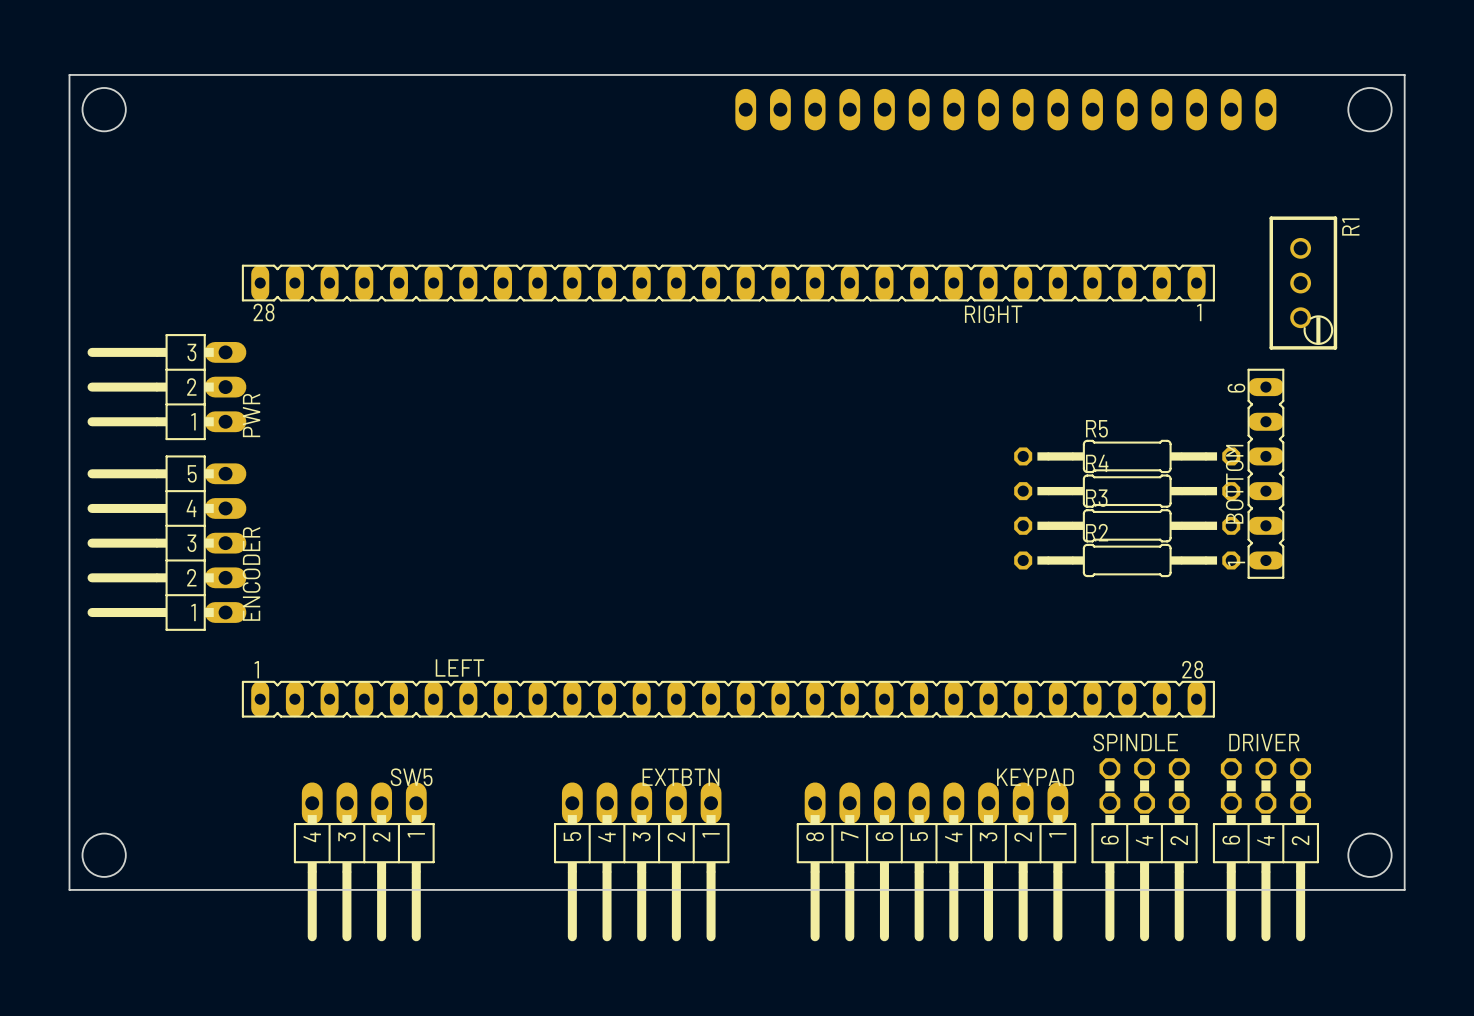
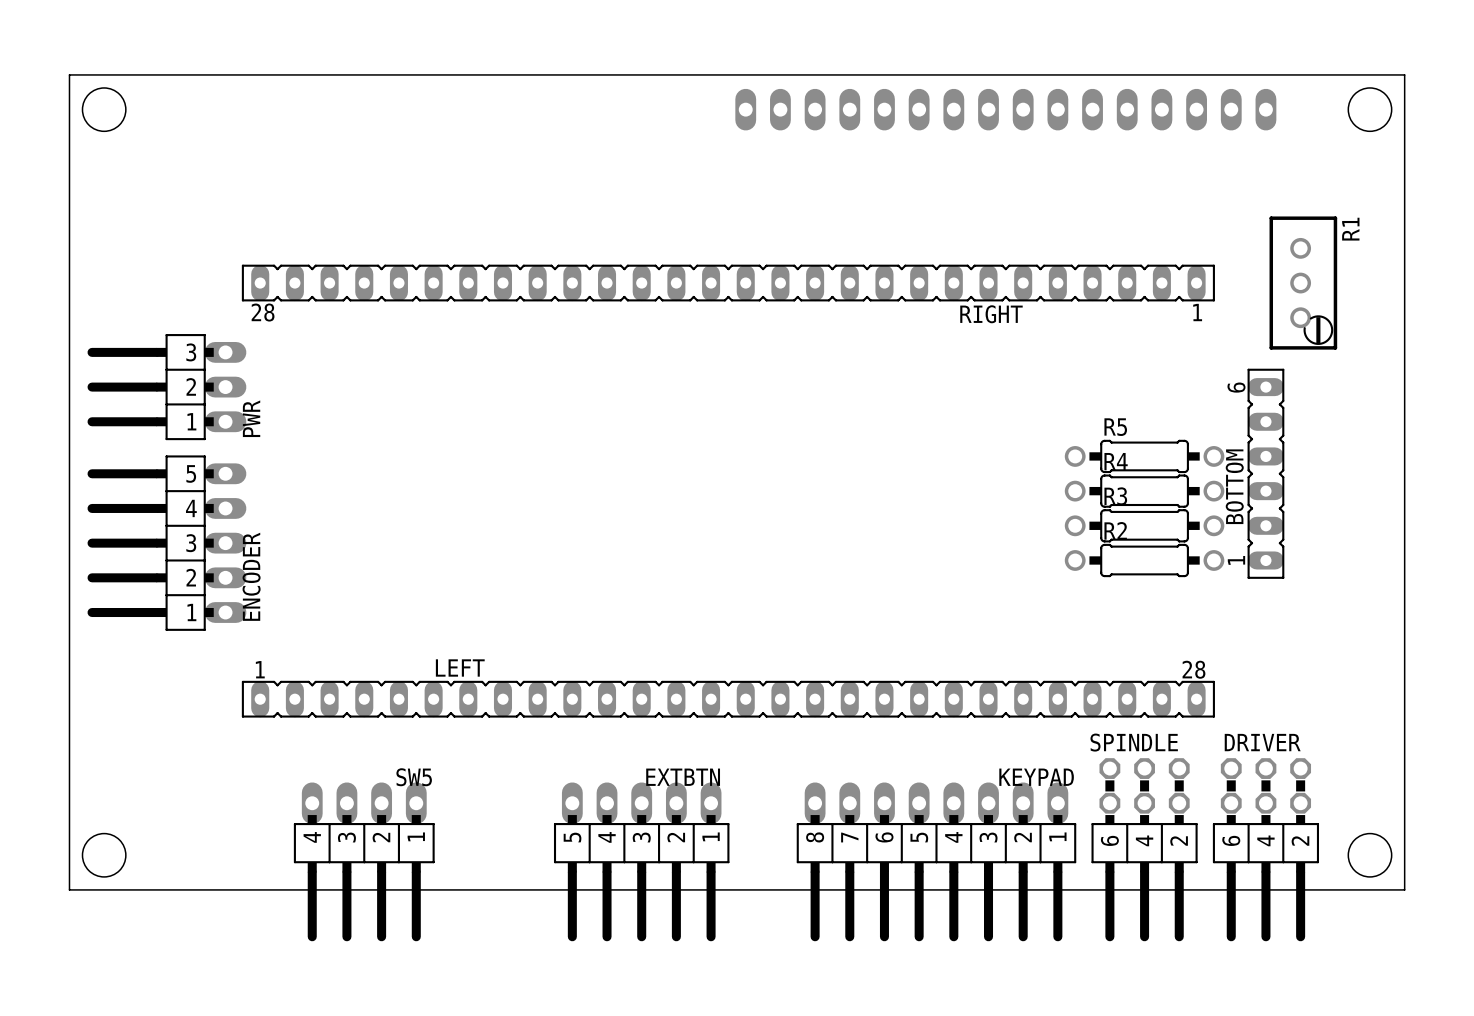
R5 footprint: [1014, 439, 1241, 474] -> [1064, 439, 1225, 474]
R4 footprint: [1014, 474, 1241, 508] -> [1064, 474, 1225, 508]
R3 footprint: [1014, 509, 1241, 543] -> [1064, 509, 1225, 543]
R2 footprint: [1014, 543, 1241, 578] -> [1064, 543, 1225, 578]

